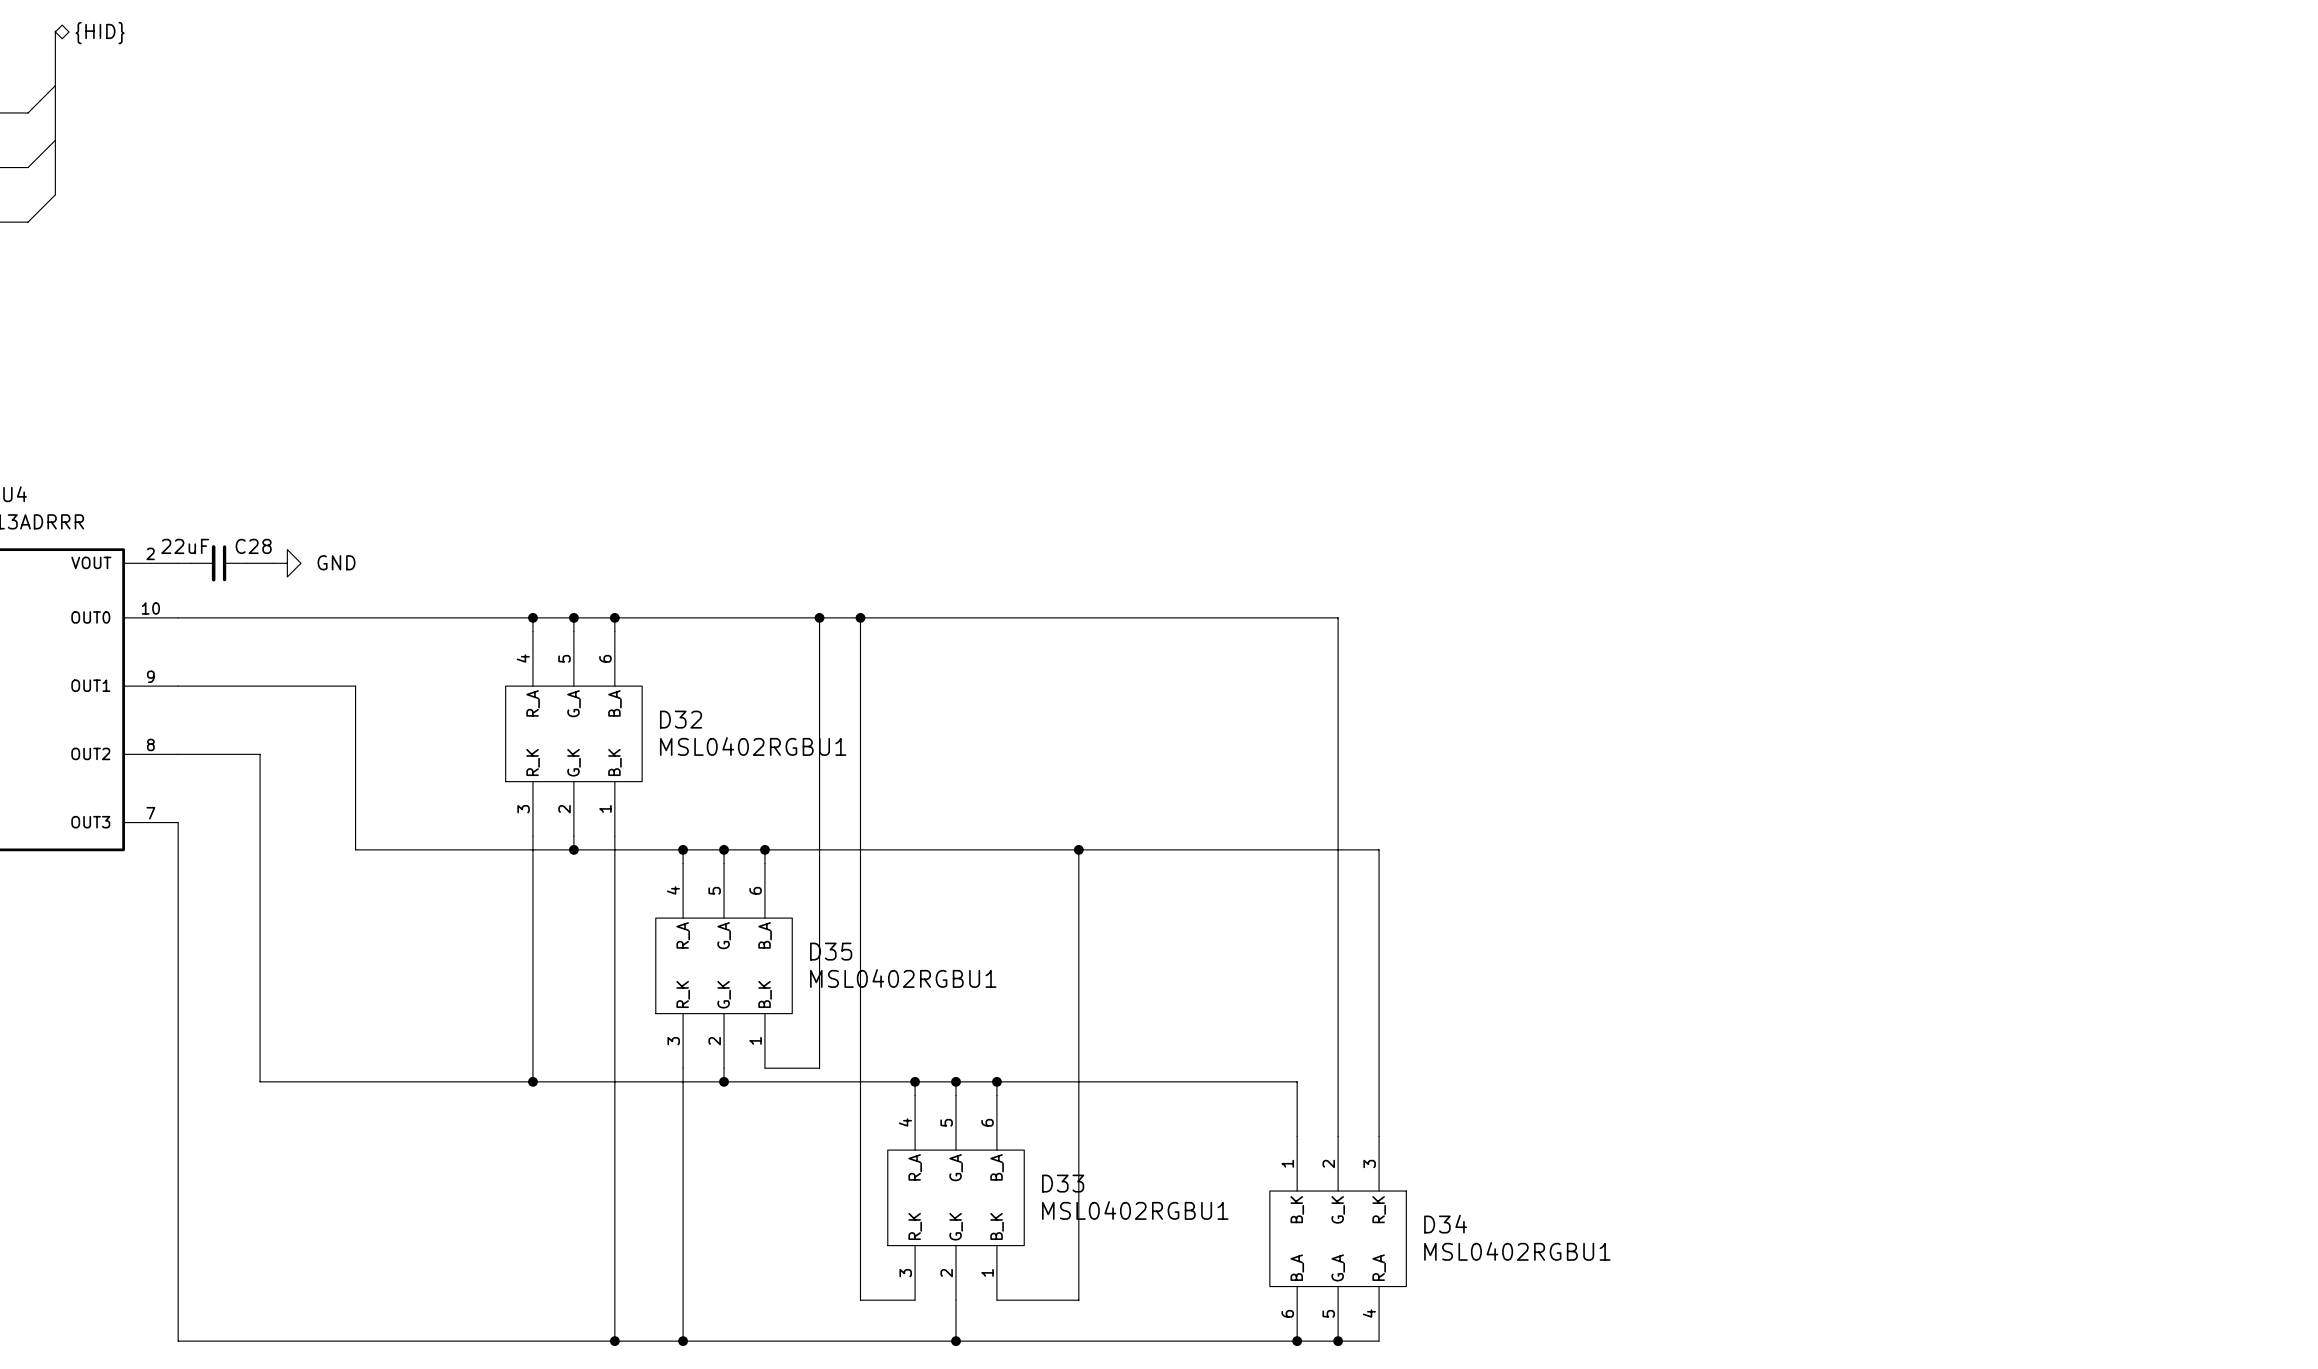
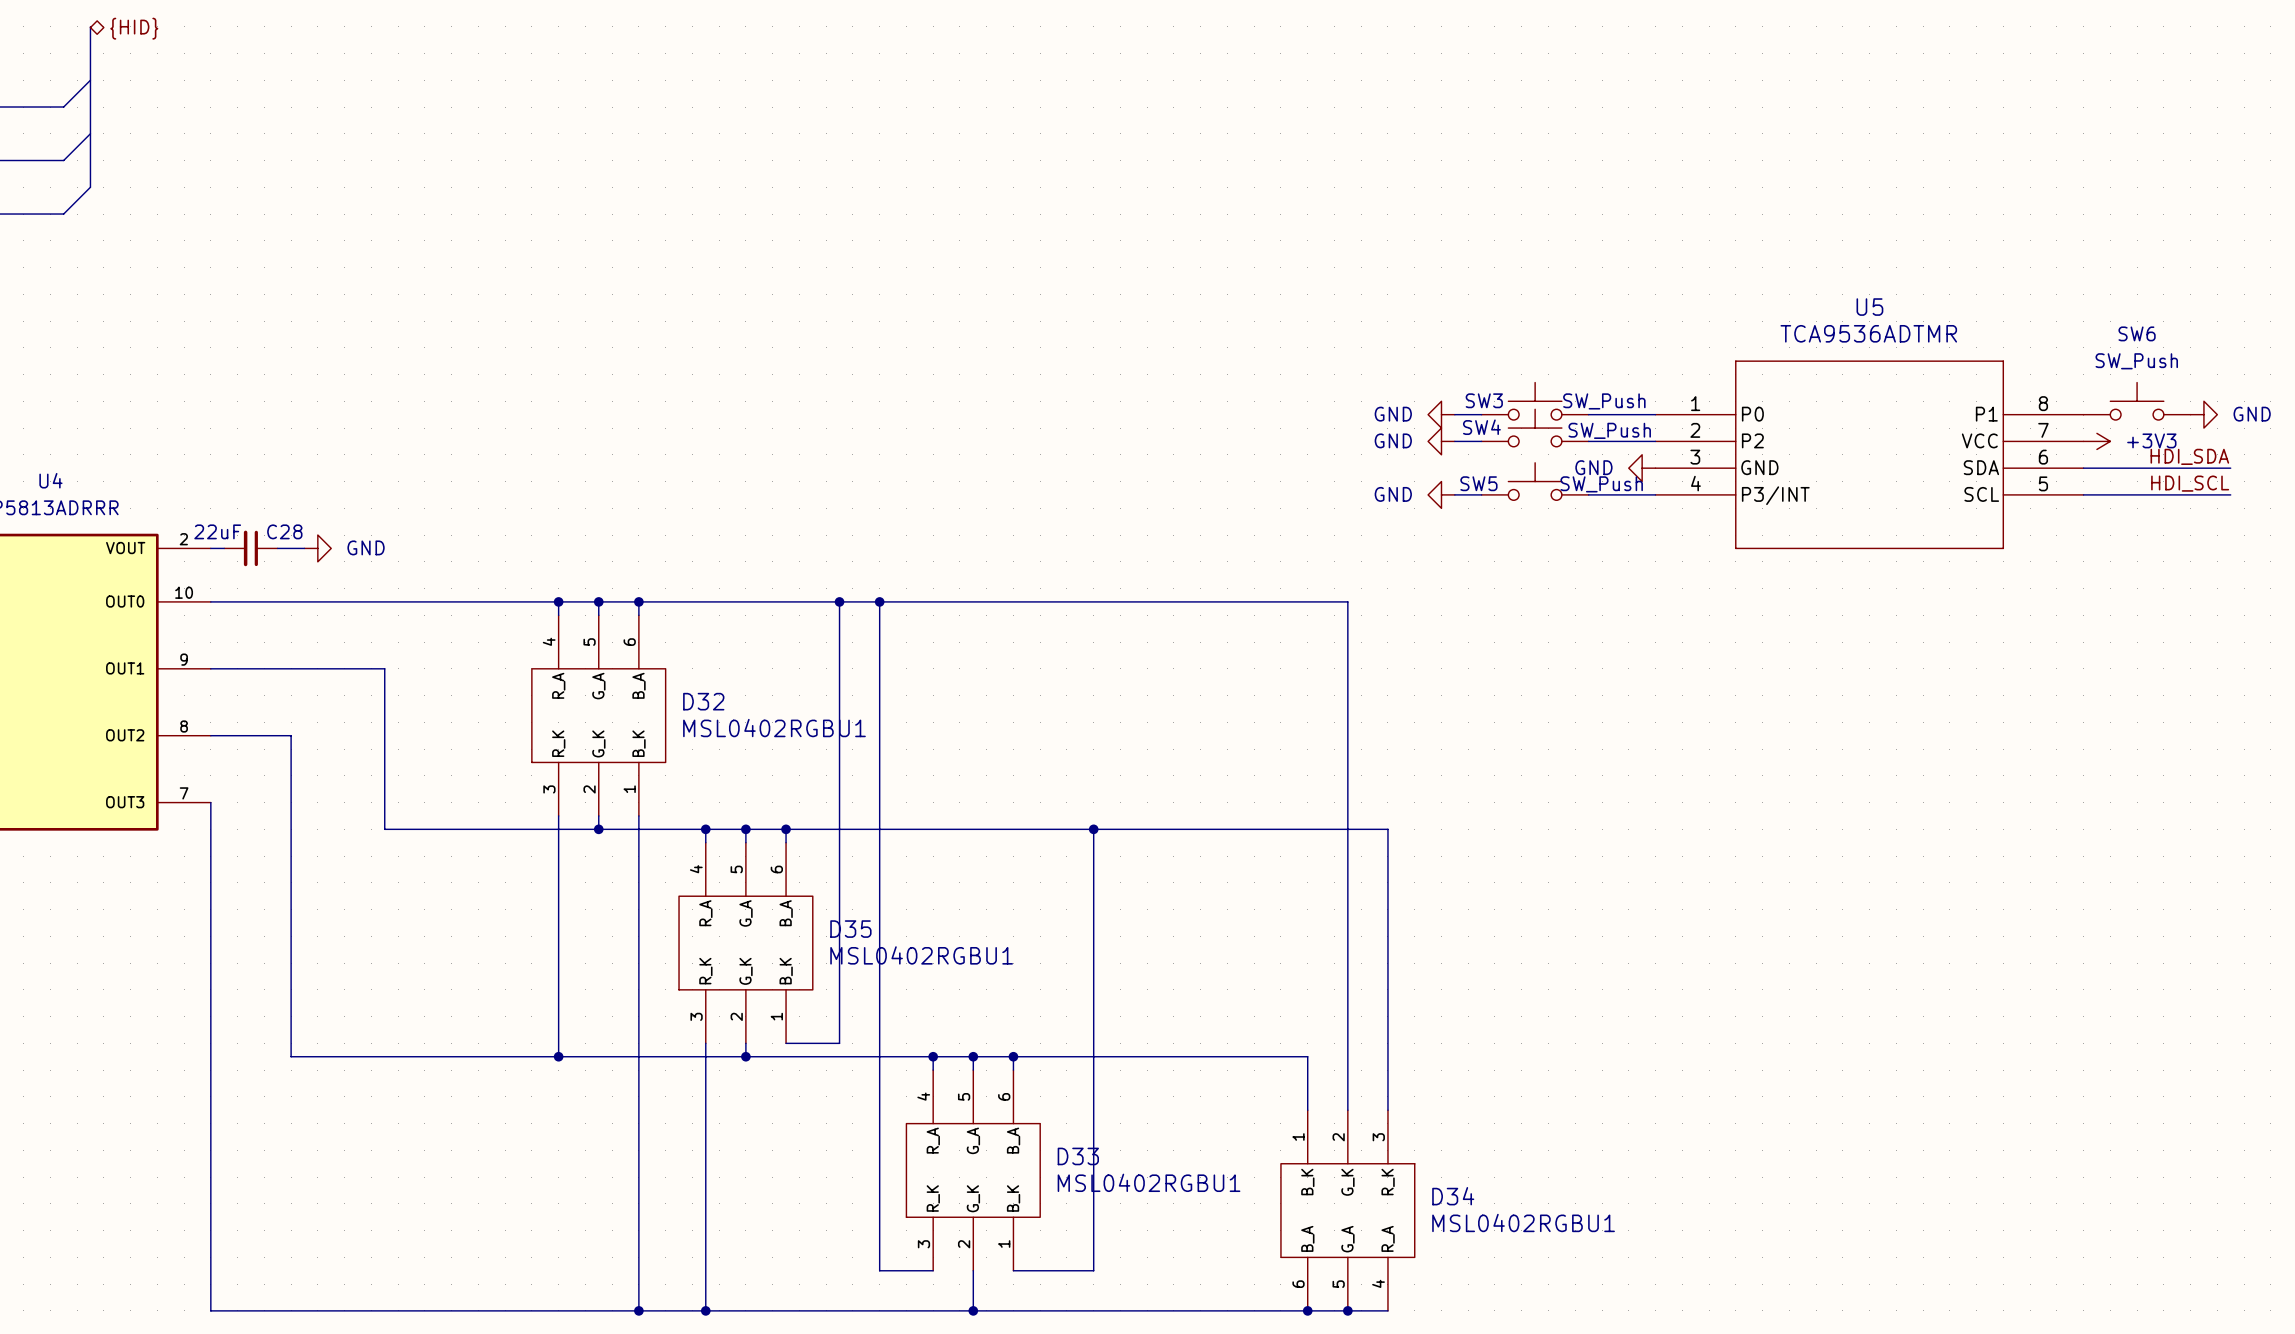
SW3: none -> SW_Push (1535, 401)
SW6: none -> SW_Push (2137, 401)
power symbol: none -> GND (1441, 414)
wire: none -> (1454, 414) (1481, 414)
wire: none -> (1588, 414) (1655, 414)
power symbol: none -> GND (2203, 414)
SW4: none -> SW_Push (1535, 428)
power symbol: none -> GND (1441, 441)
wire: none -> (1454, 441) (1481, 441)
wire: none -> (1588, 441) (1655, 441)
power symbol: none -> +3V3 (2096, 441)
U5: none -> TCA9536ADTMR (1869, 454)
label: none -> HDI_SDA (2189, 456)
power symbol: none -> GND (1642, 468)
wire: none -> (2083, 468) (2230, 468)
SW5: none -> SW_Push (1535, 481)
label: none -> HDI_SCL (2190, 483)
power symbol: none -> GND (1441, 494)
wire: none -> (1454, 494) (1481, 494)
wire: none -> (1588, 494) (1655, 494)
wire: none -> (2083, 494) (2230, 494)

